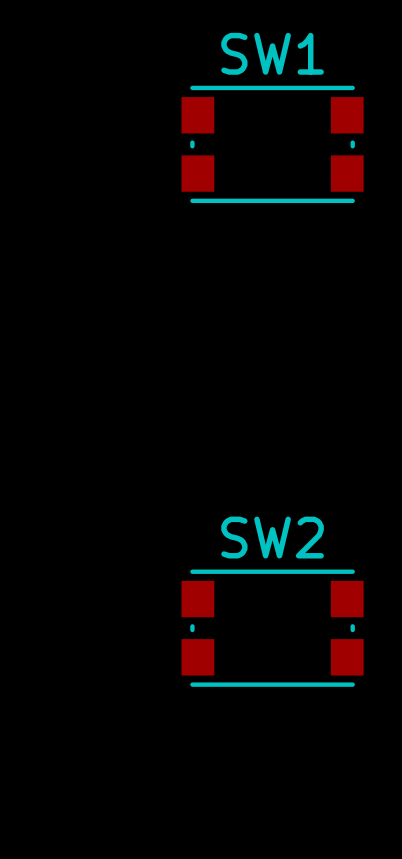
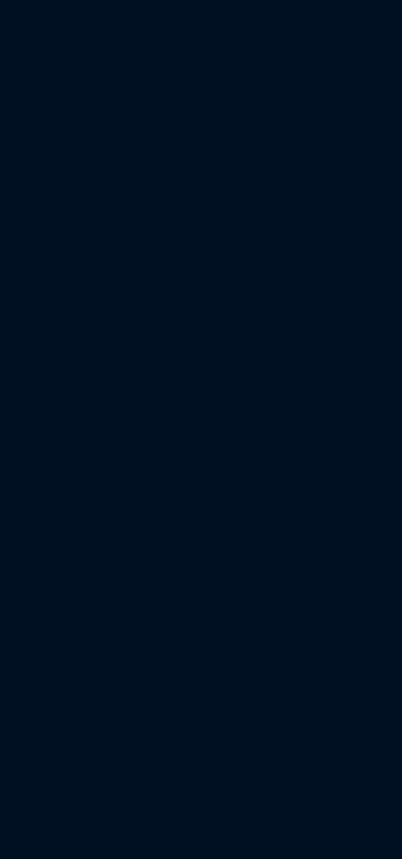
SW1: (272, 144) -> none
SW2: (272, 628) -> none

